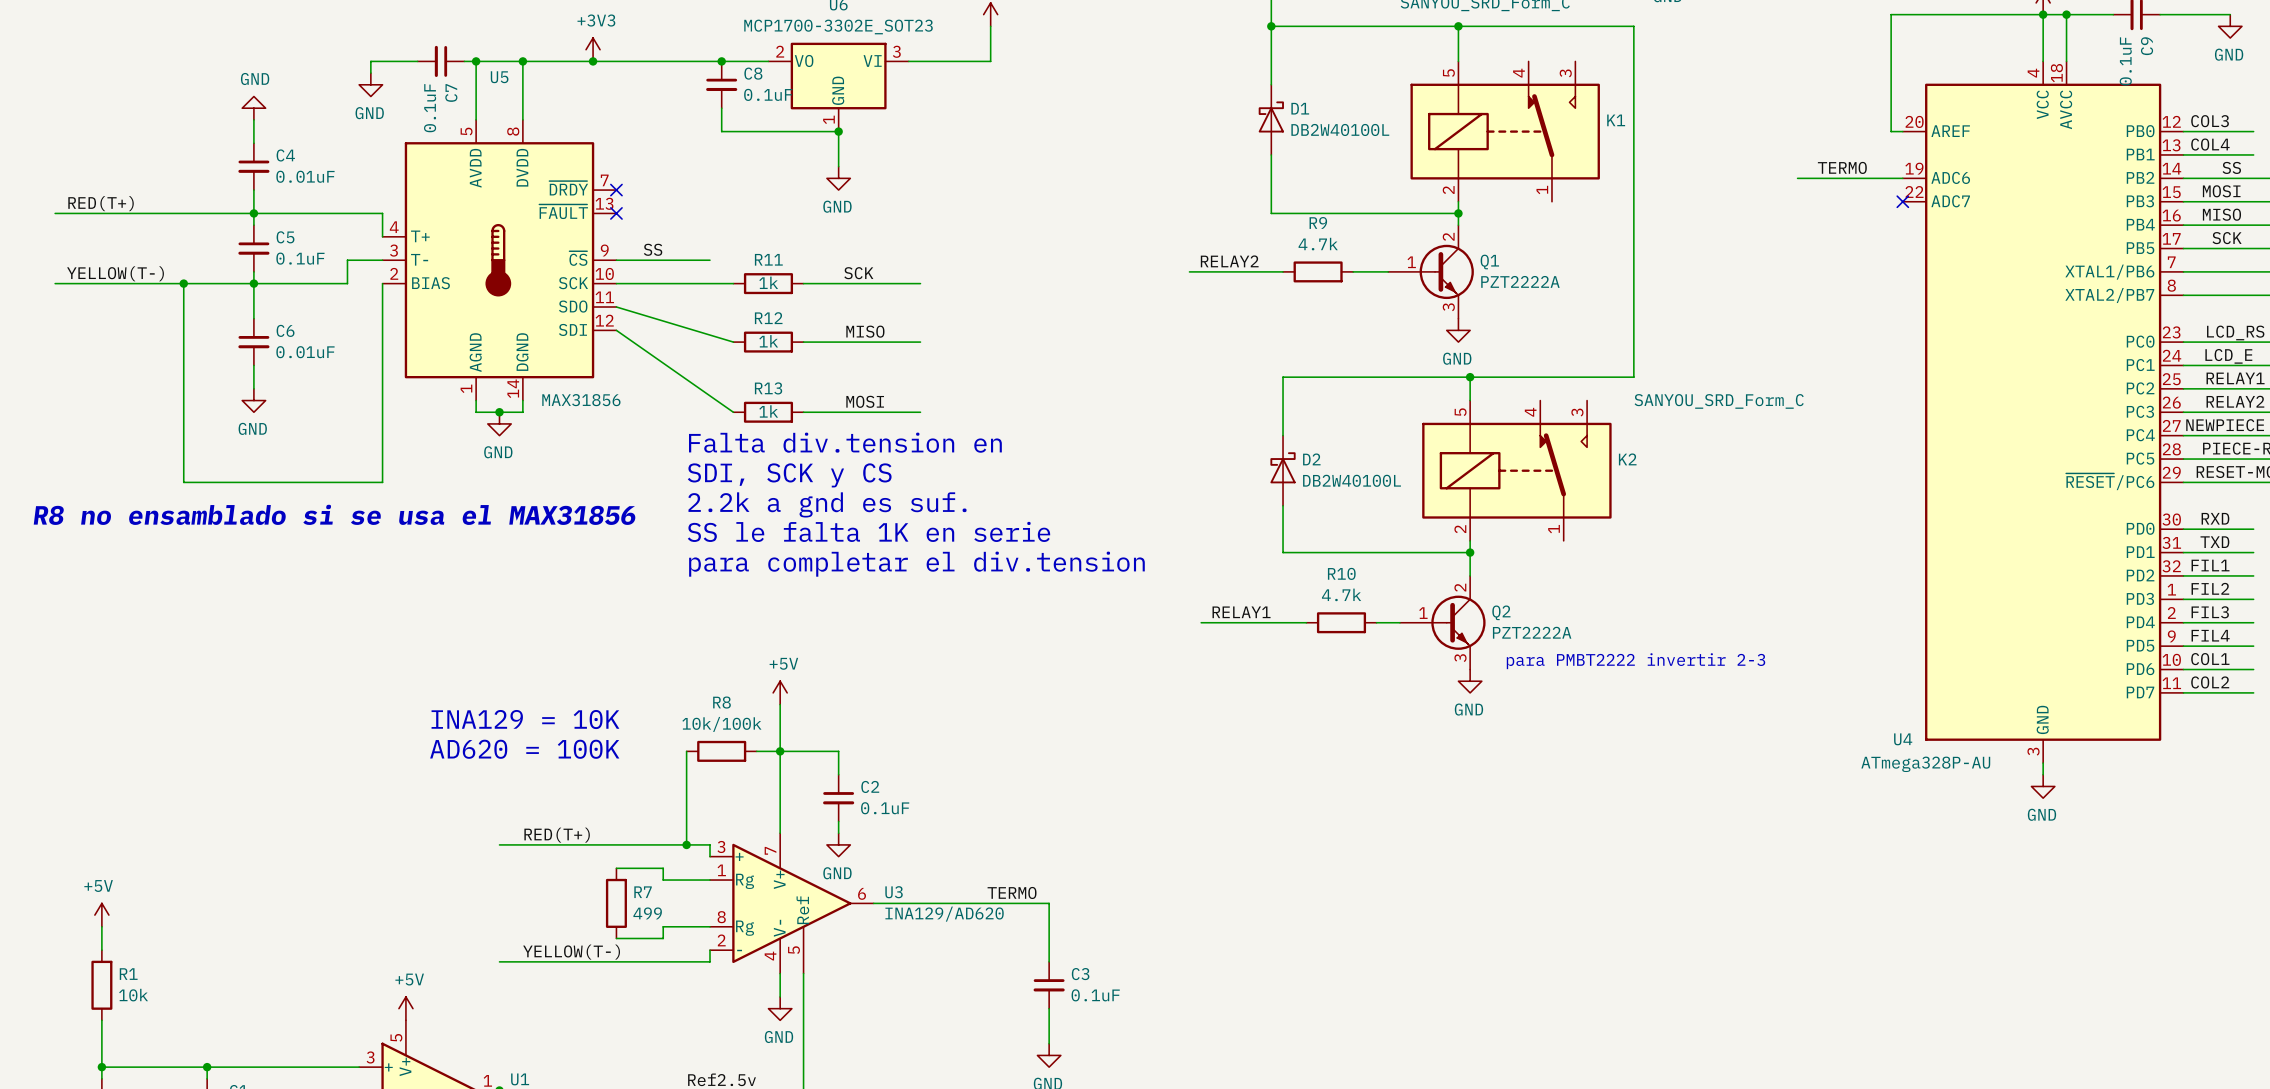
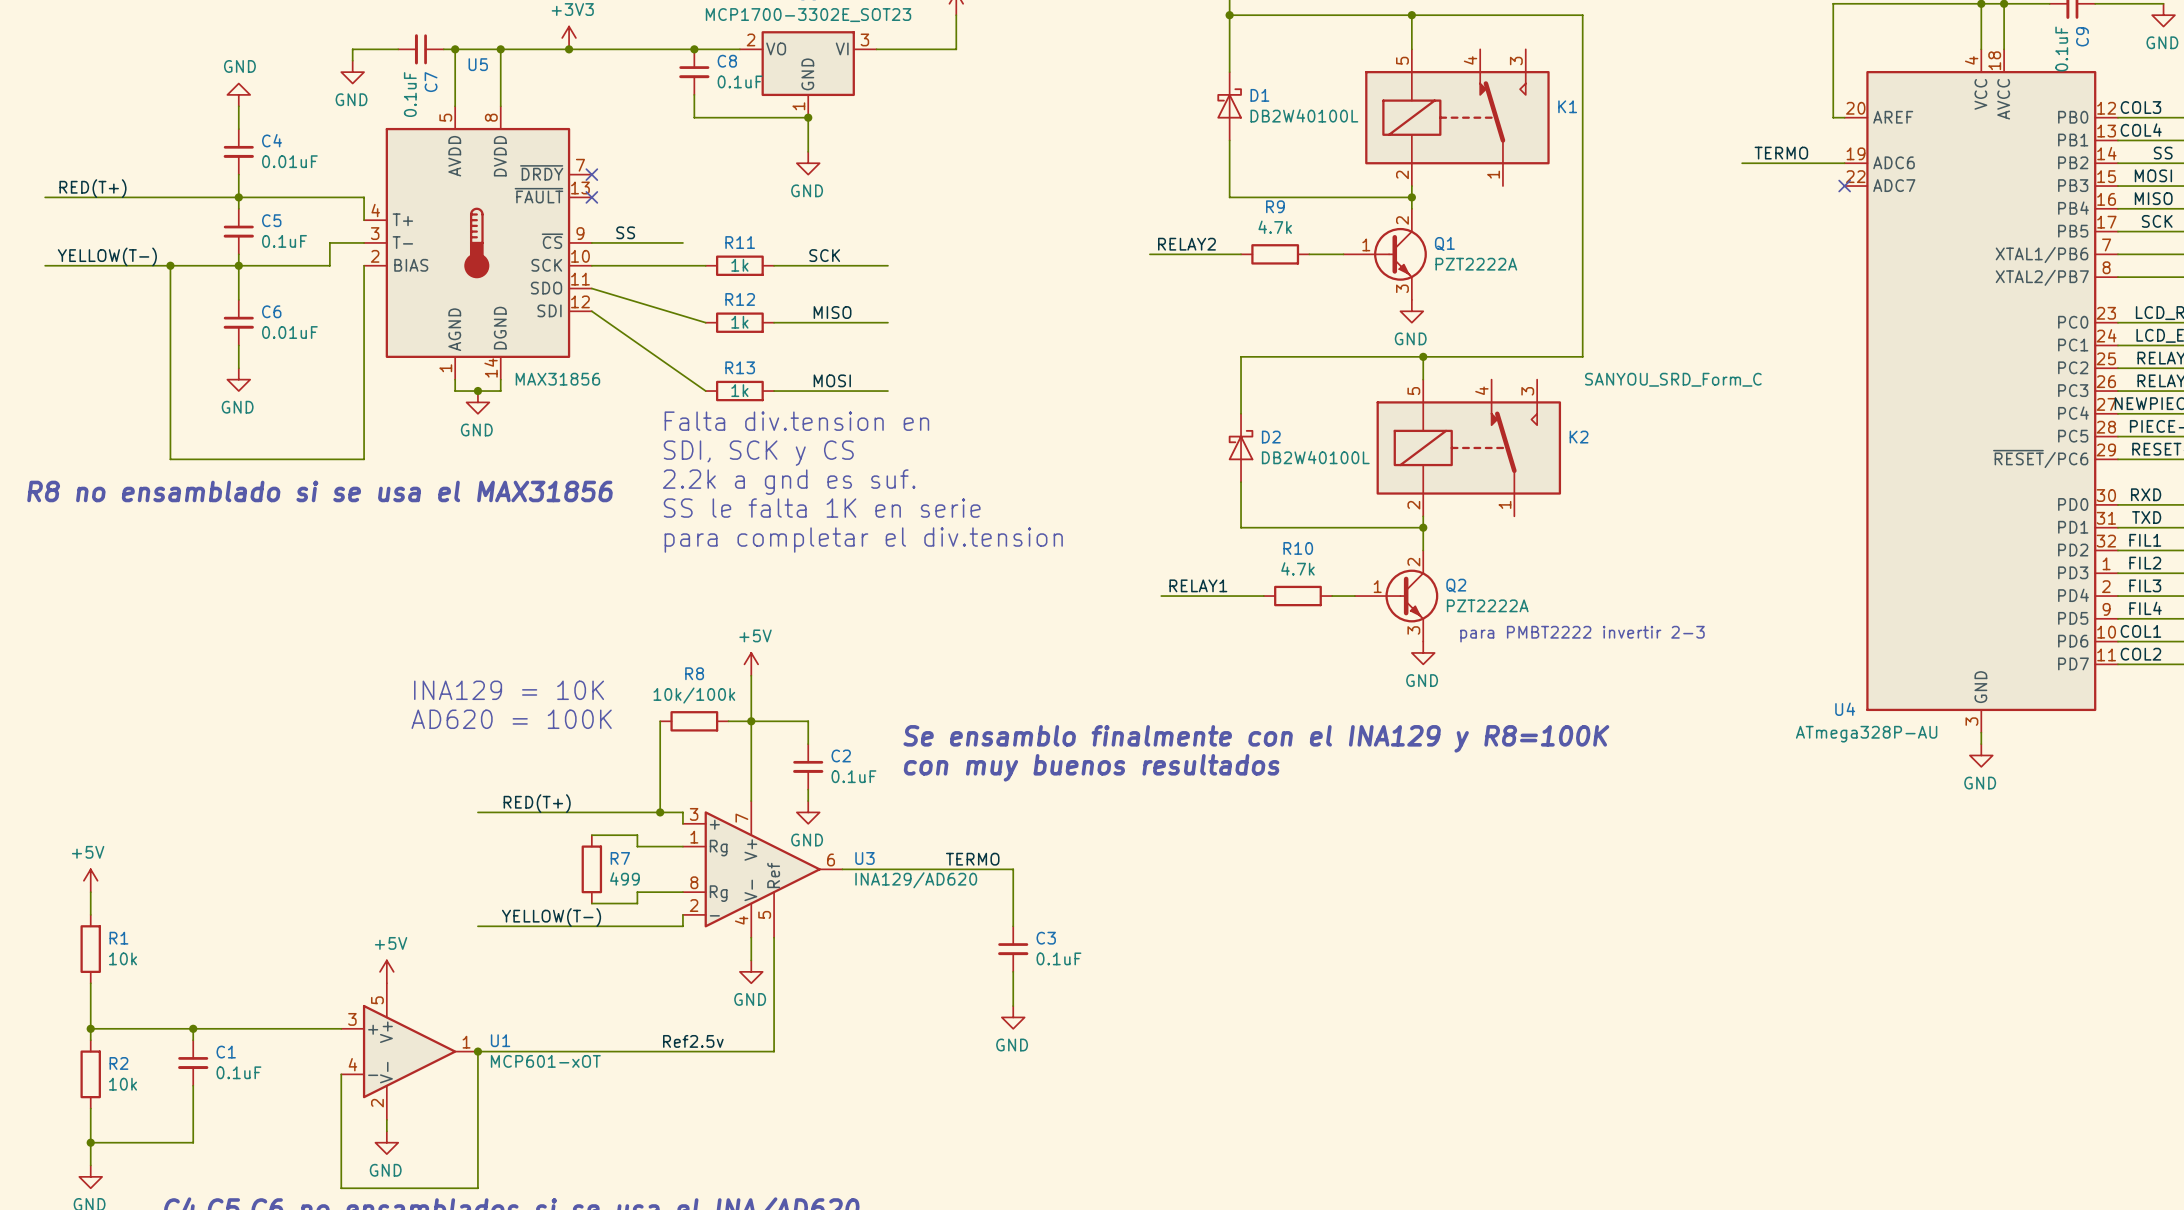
text: none -> Se ensamblo finalmente con el INA129 y R8=100K (1256, 738)
text: none -> con muy buenos resultados (1091, 767)

